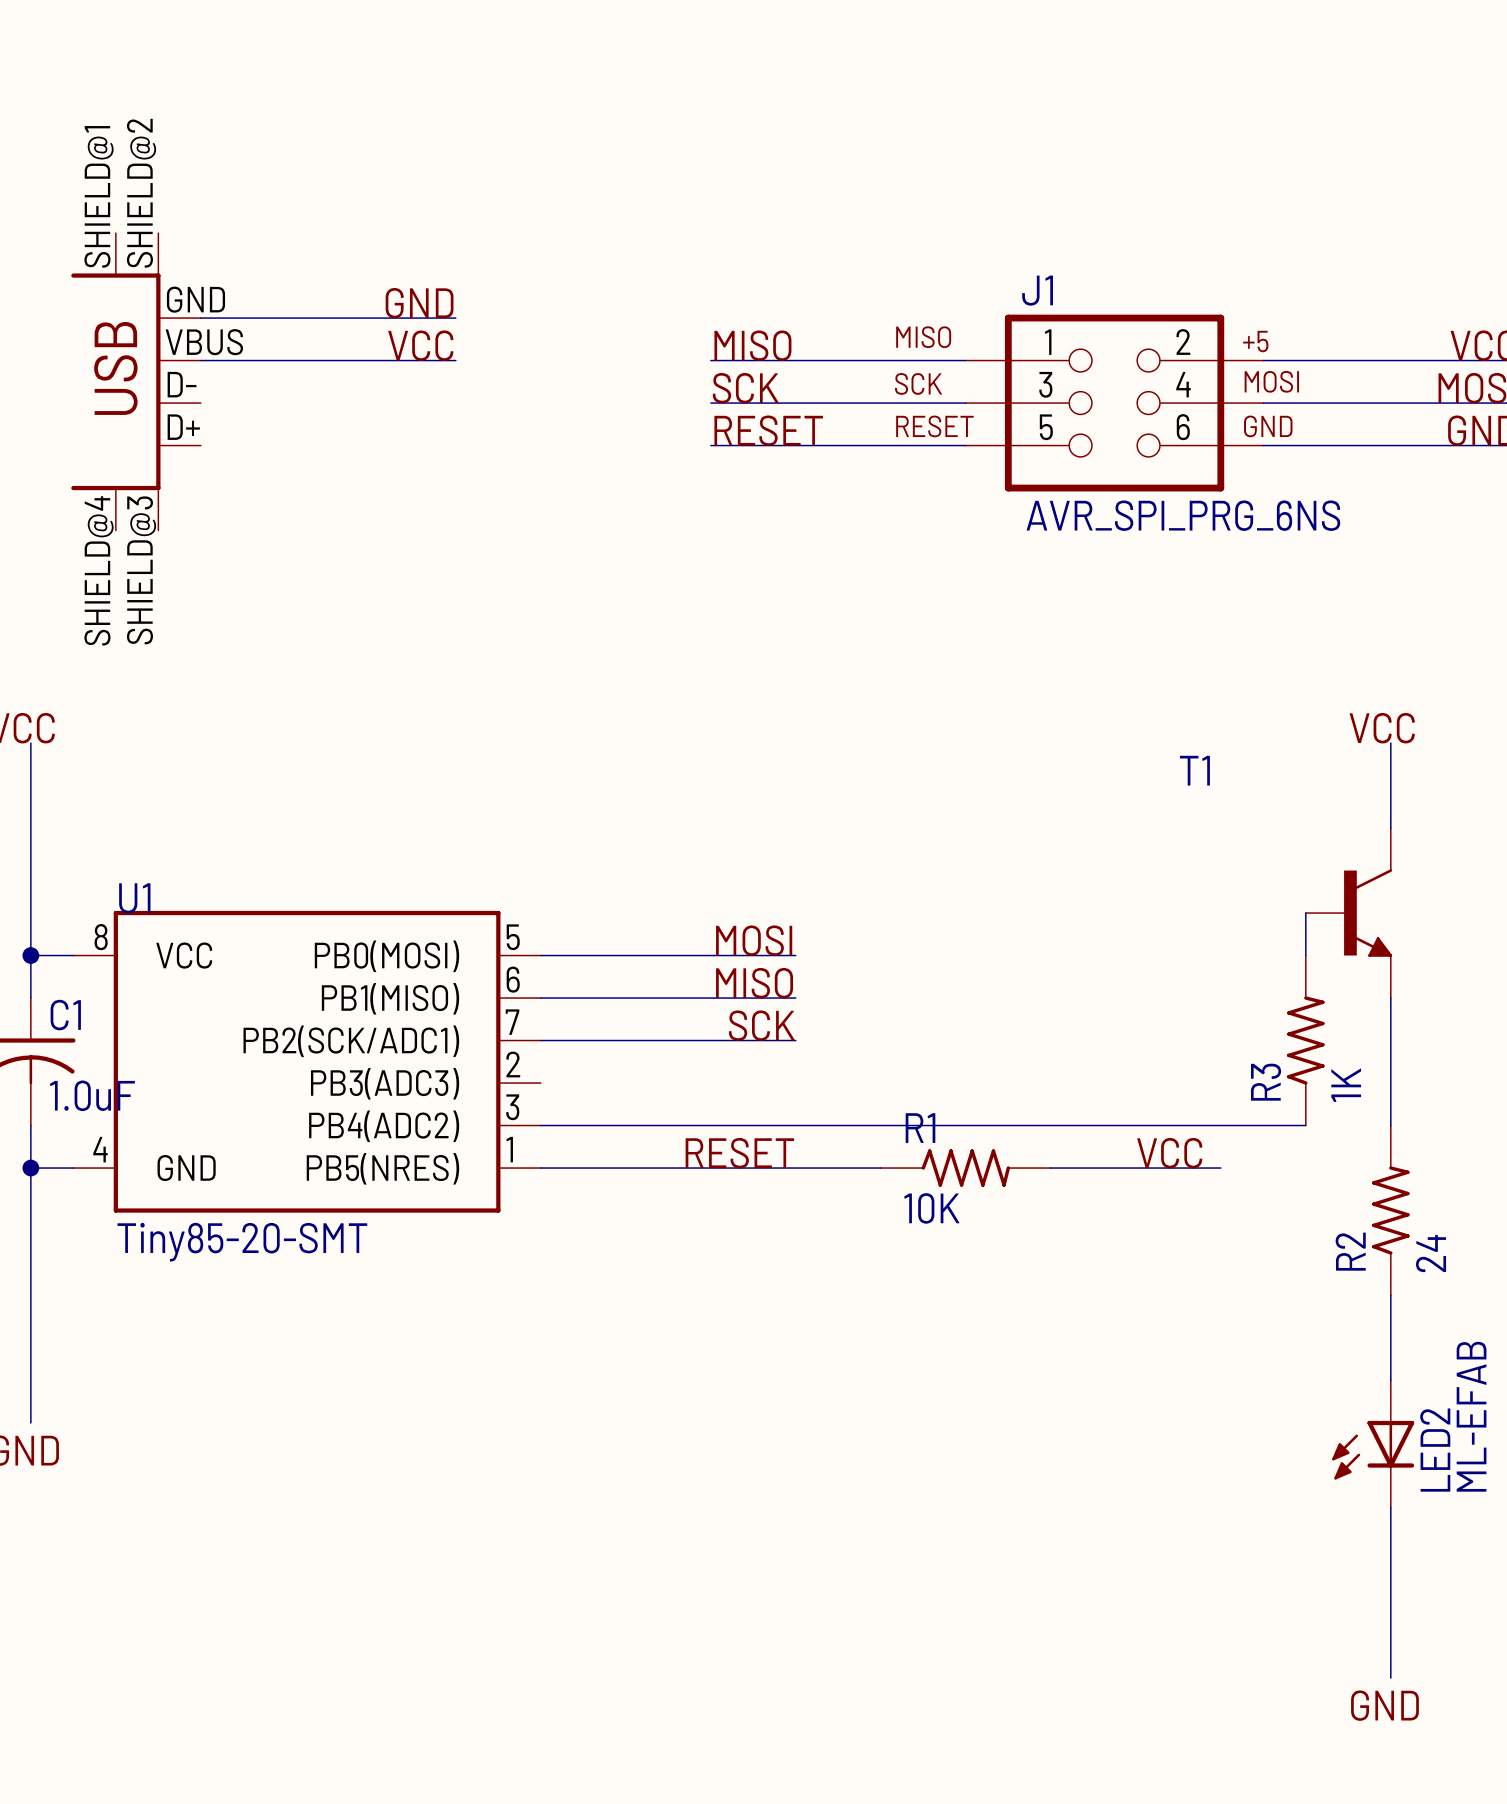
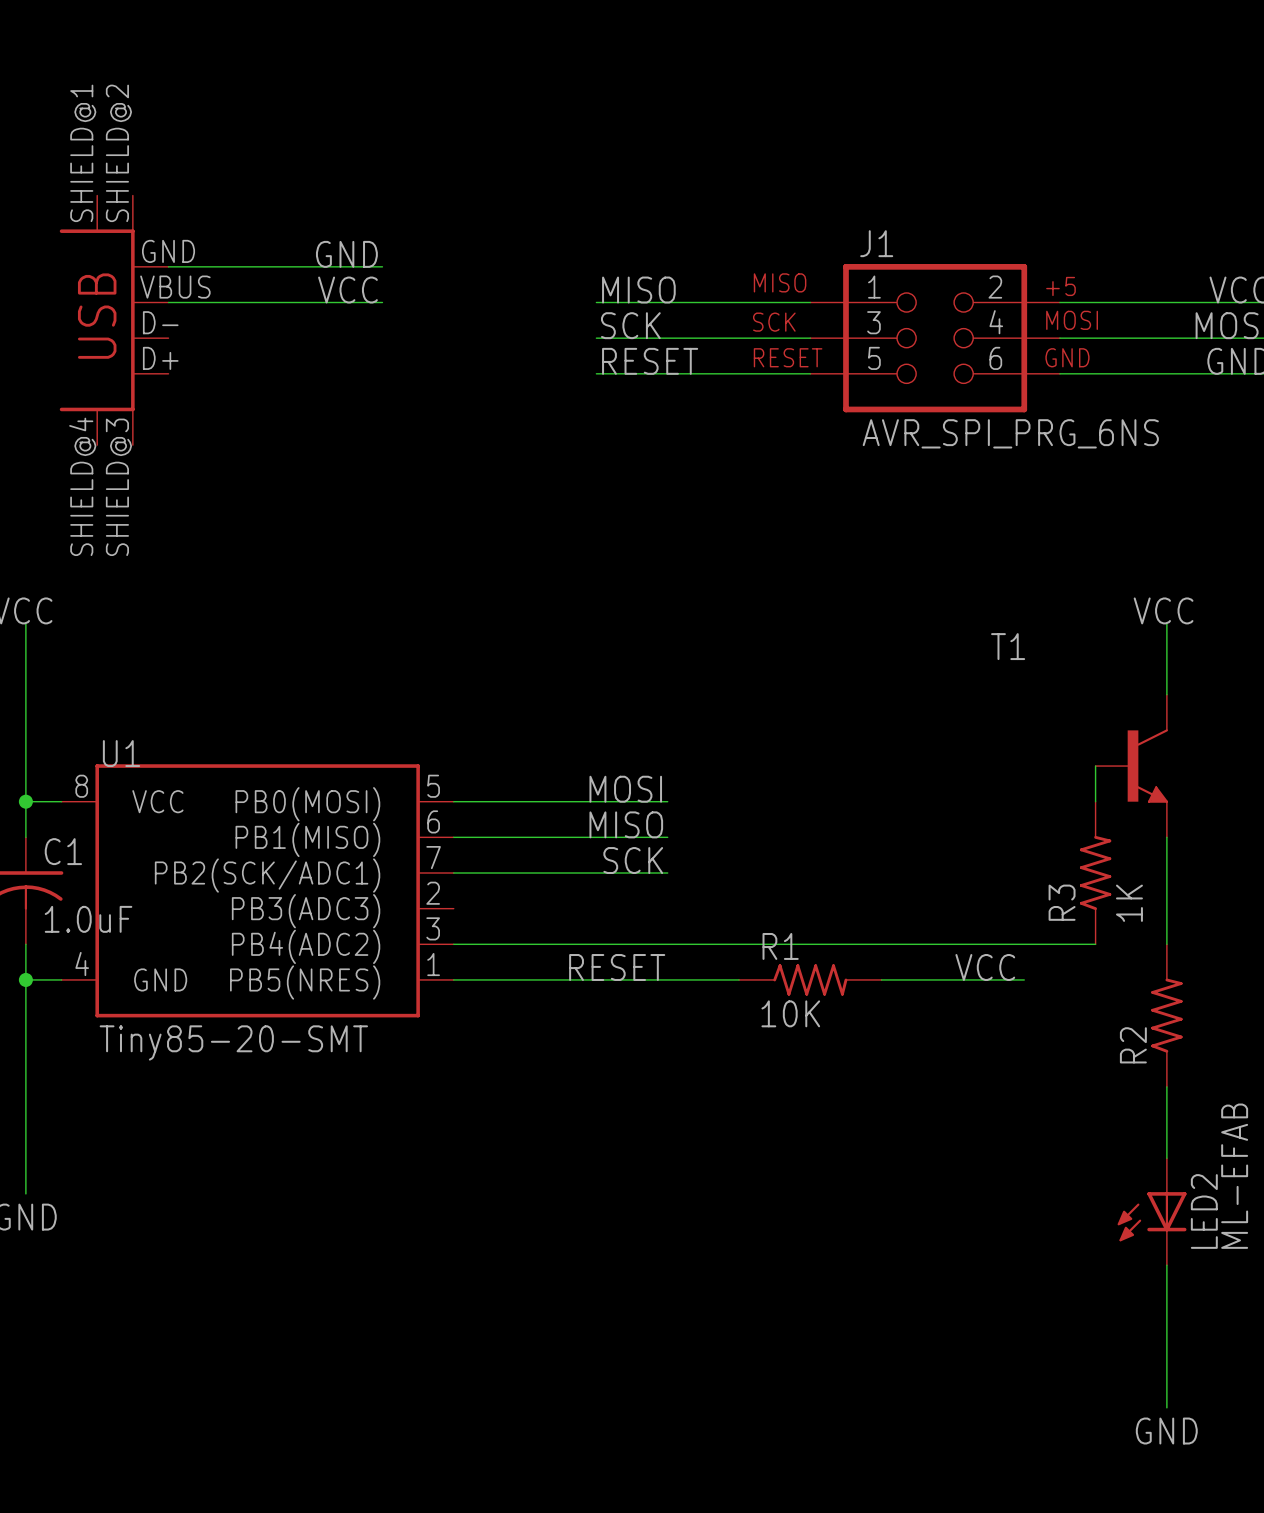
R2 value: 24 (1431, 1253) -> none

